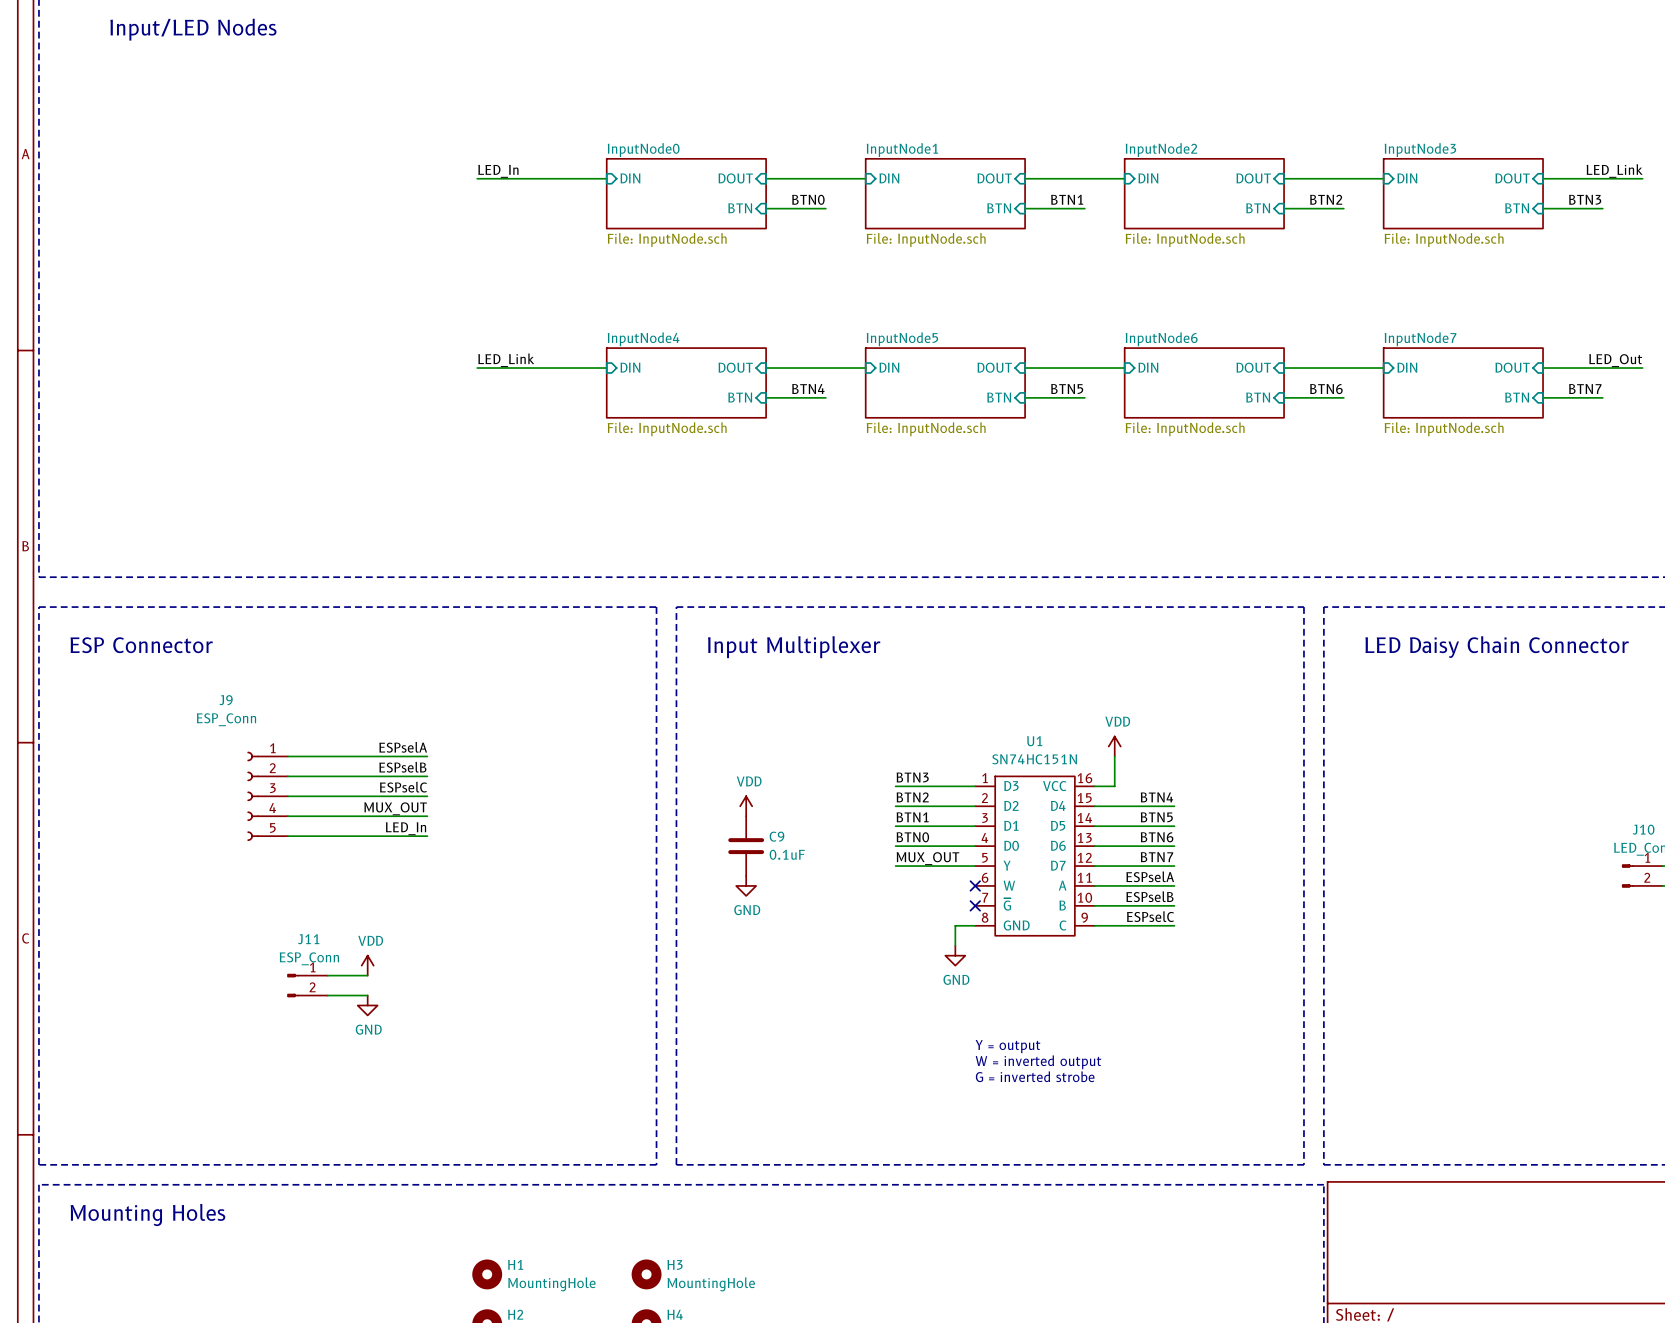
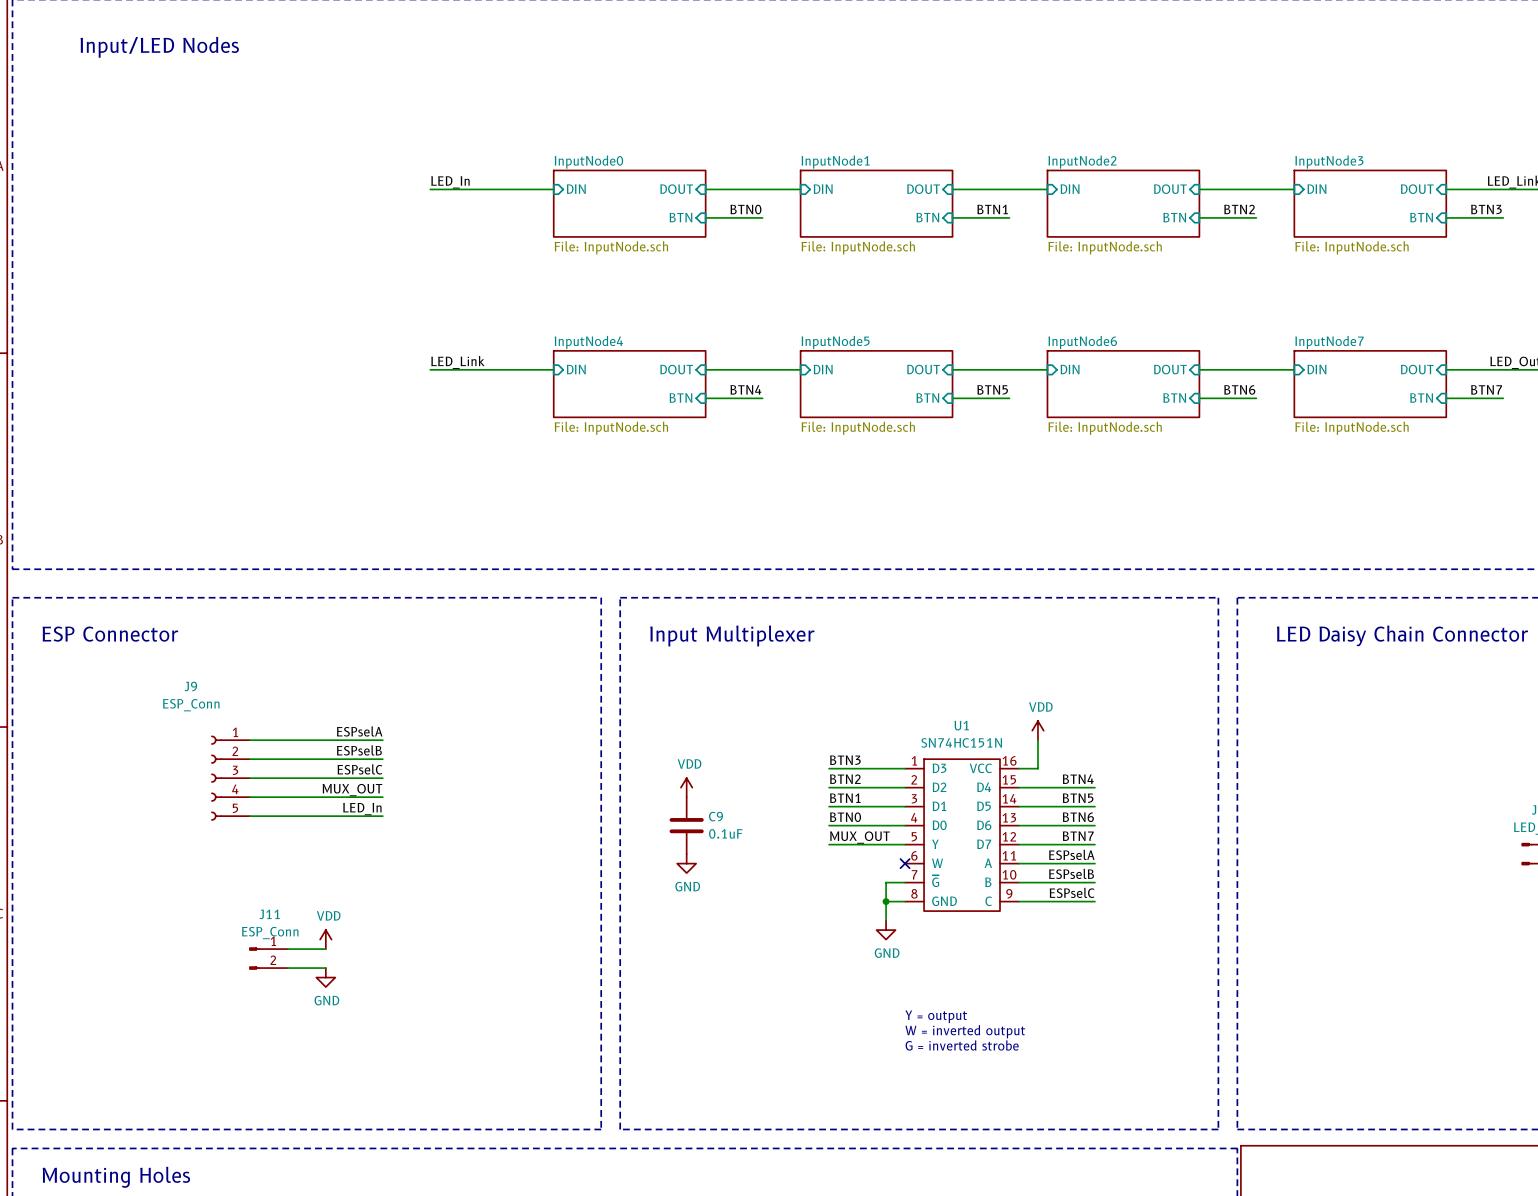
wire: none -> (905, 882) (886, 882) (886, 901)
no-connect mark: (975, 905) -> none
junction: none -> (886, 901)

